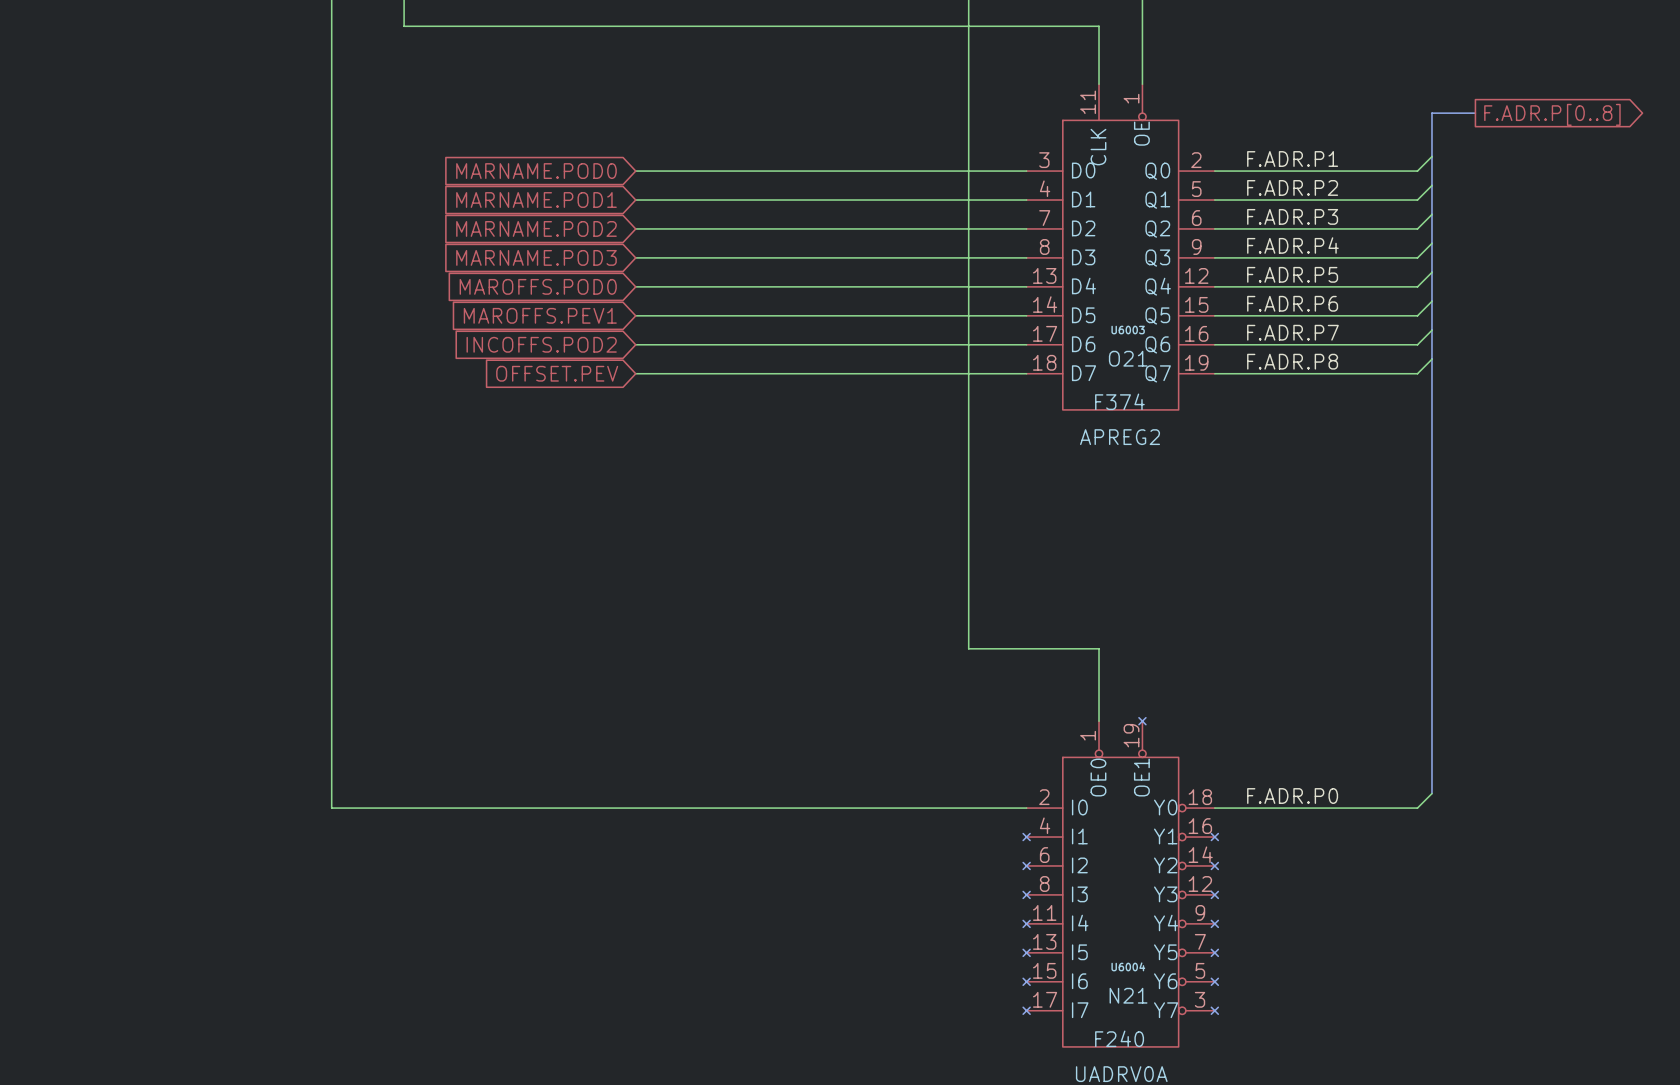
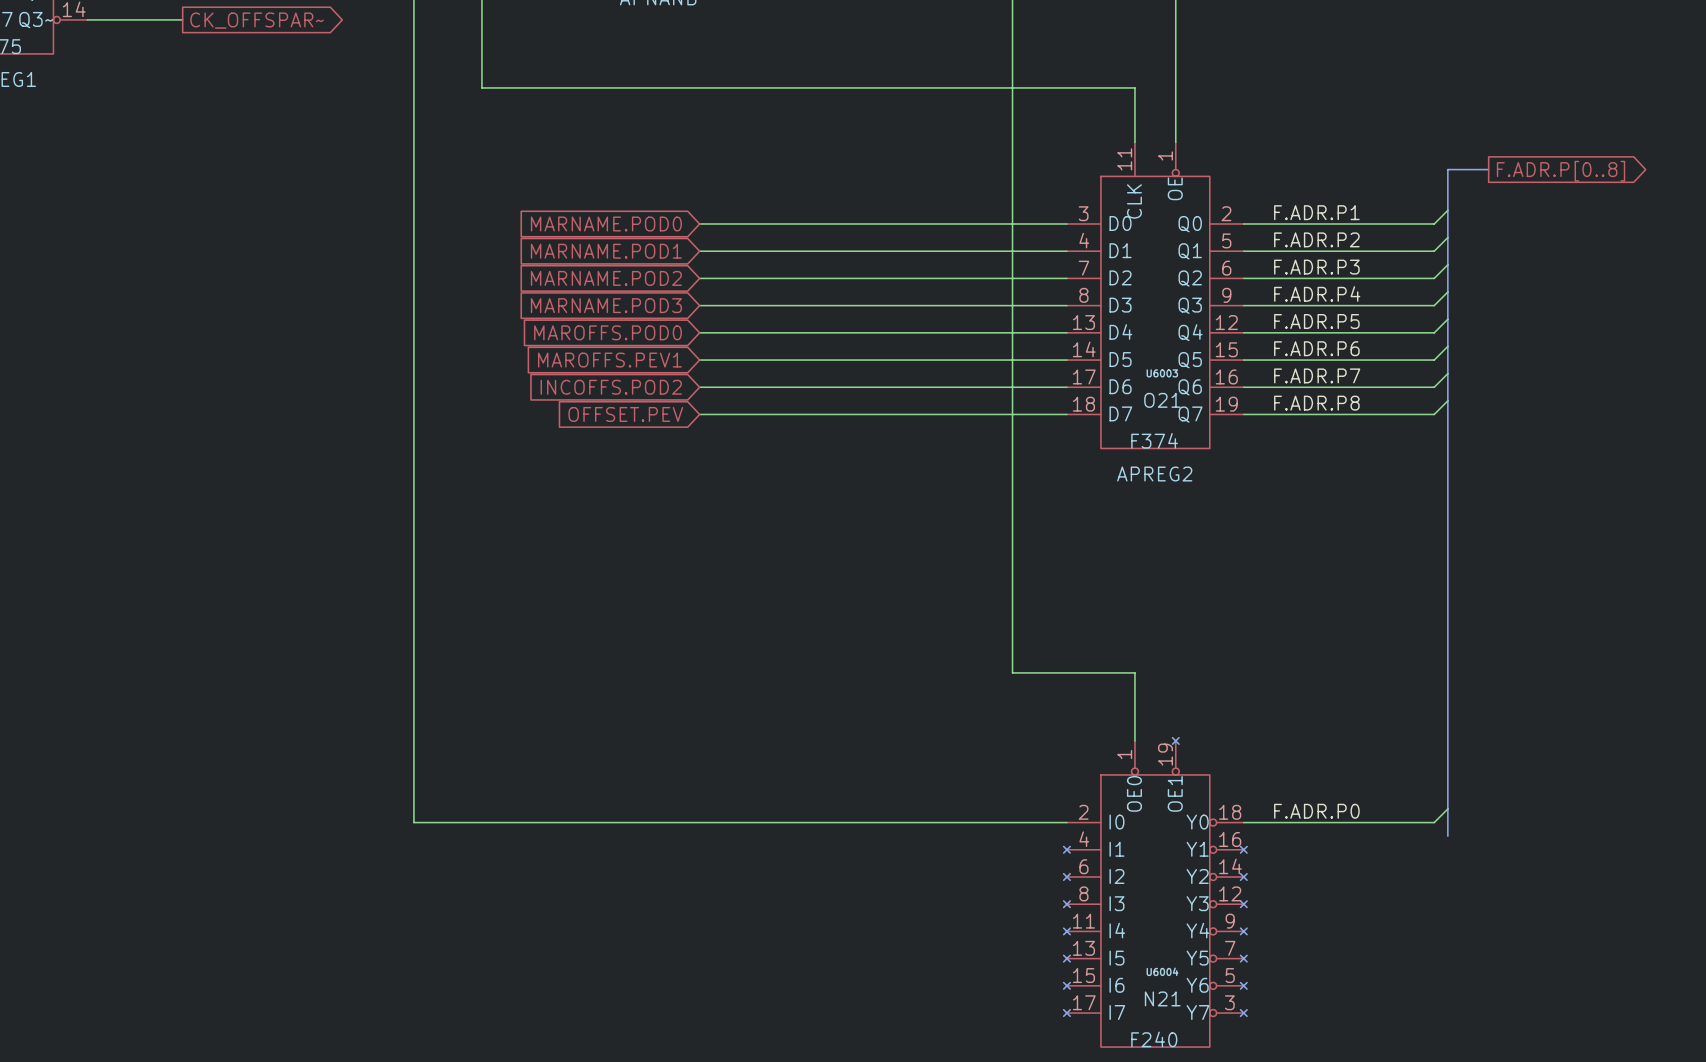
bus: none -> (1447, 808) (1447, 836)

